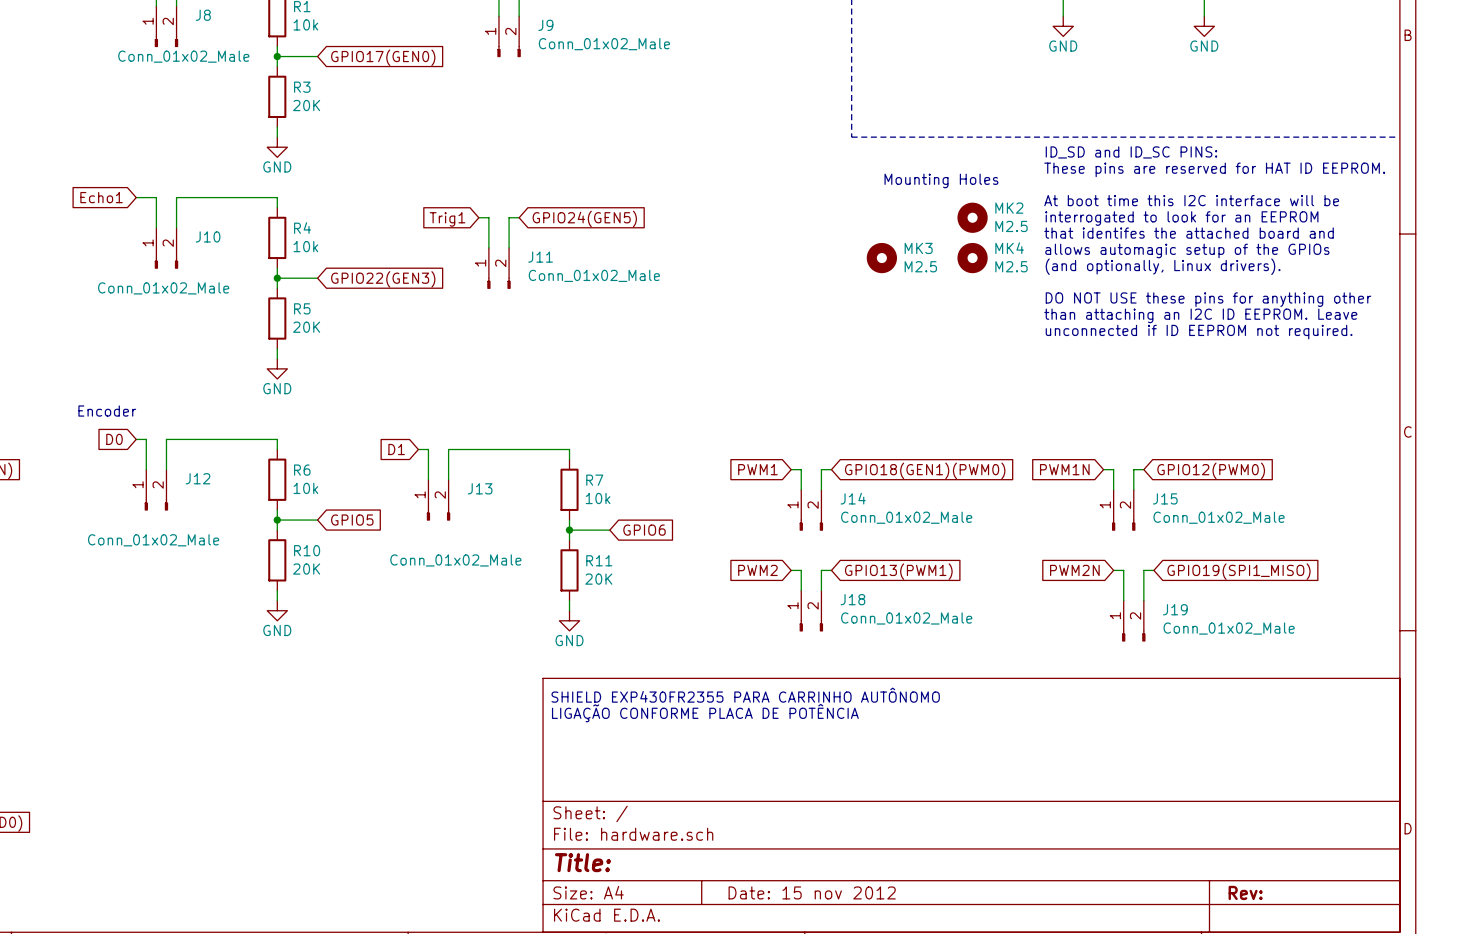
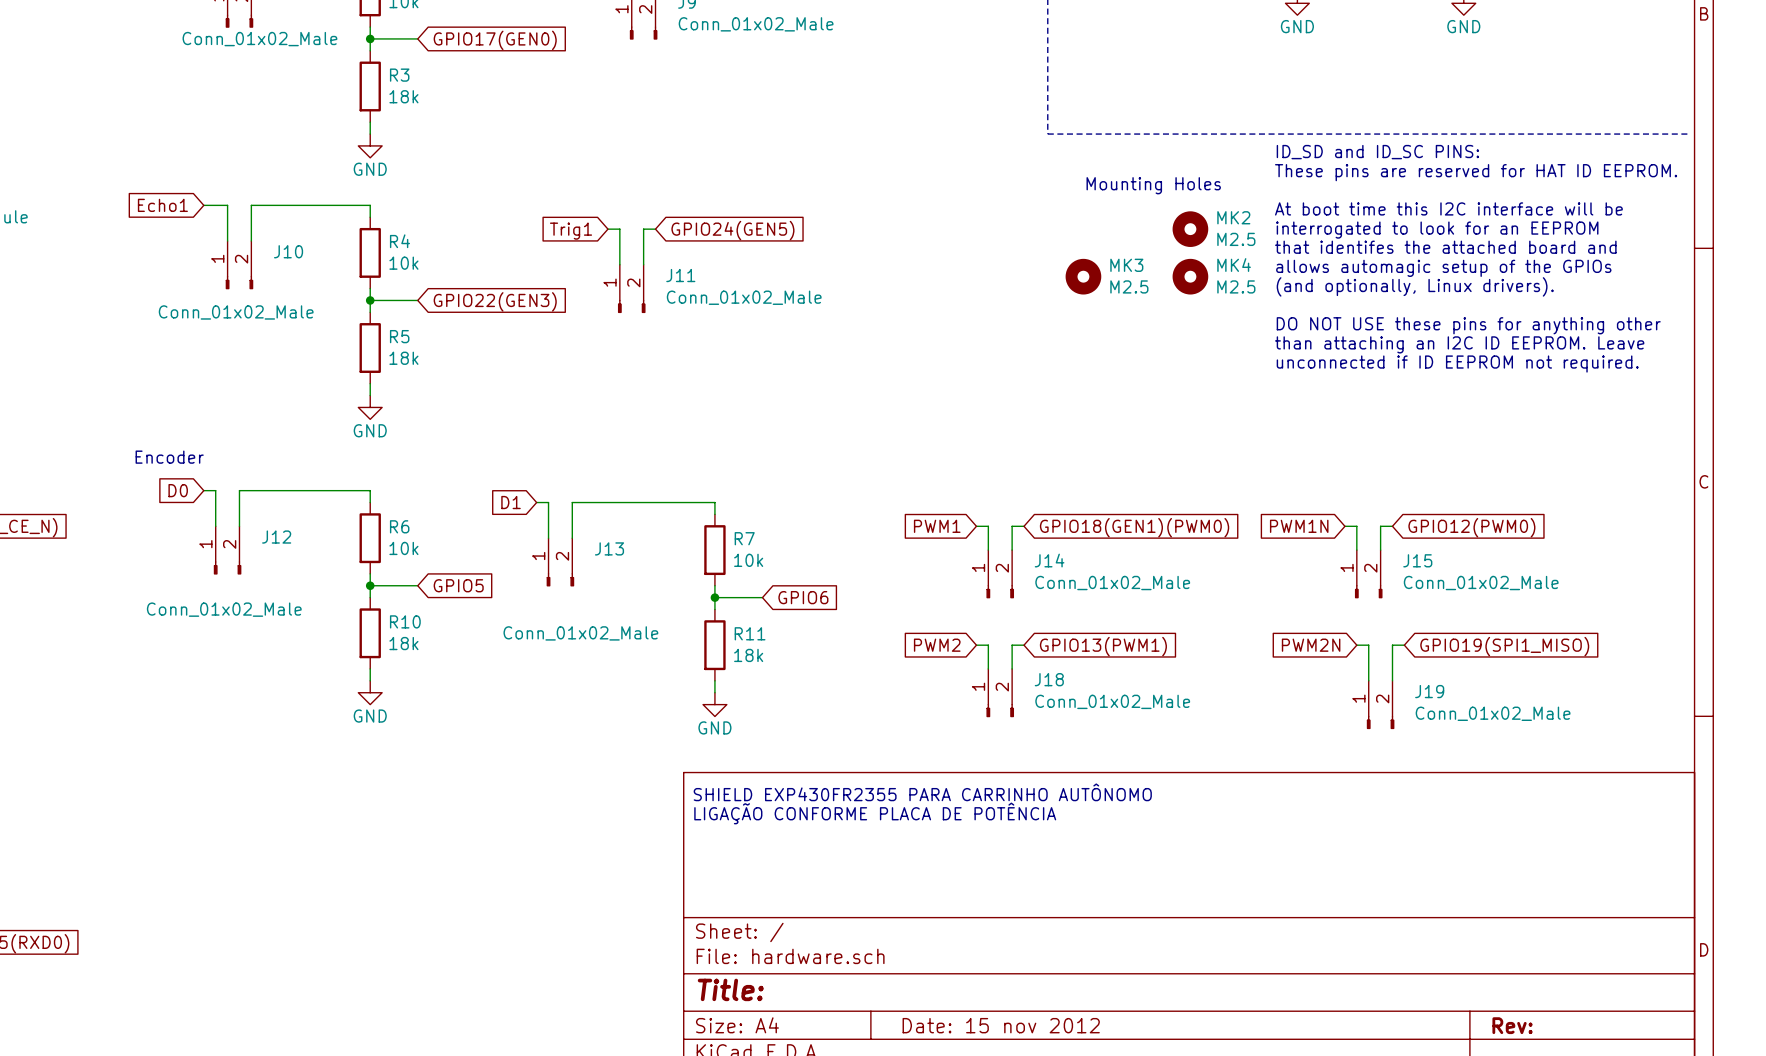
R3 value: 20K (306, 105) -> 18k (403, 96)
R5 value: 20K (306, 327) -> 18k (403, 358)
R10 value: 20K (306, 569) -> 18k (403, 643)
R11 value: 20K (598, 579) -> 18k (748, 655)

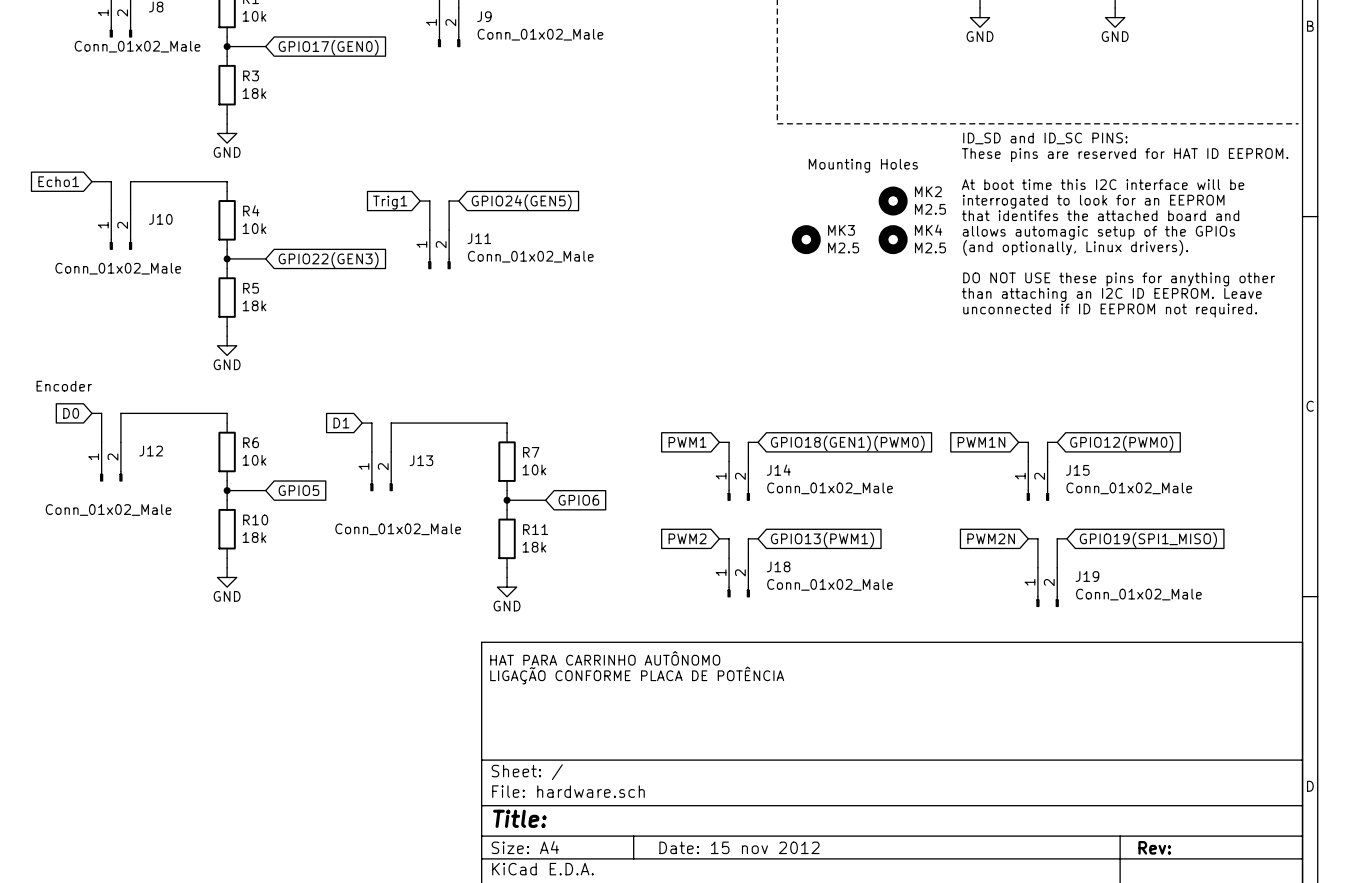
text: SHIELD EXP430FR2355 PARA CARRINHO AUTÔNOMO (922, 792) -> HAT PARA CARRINHO AUTÔNOMO (605, 658)

